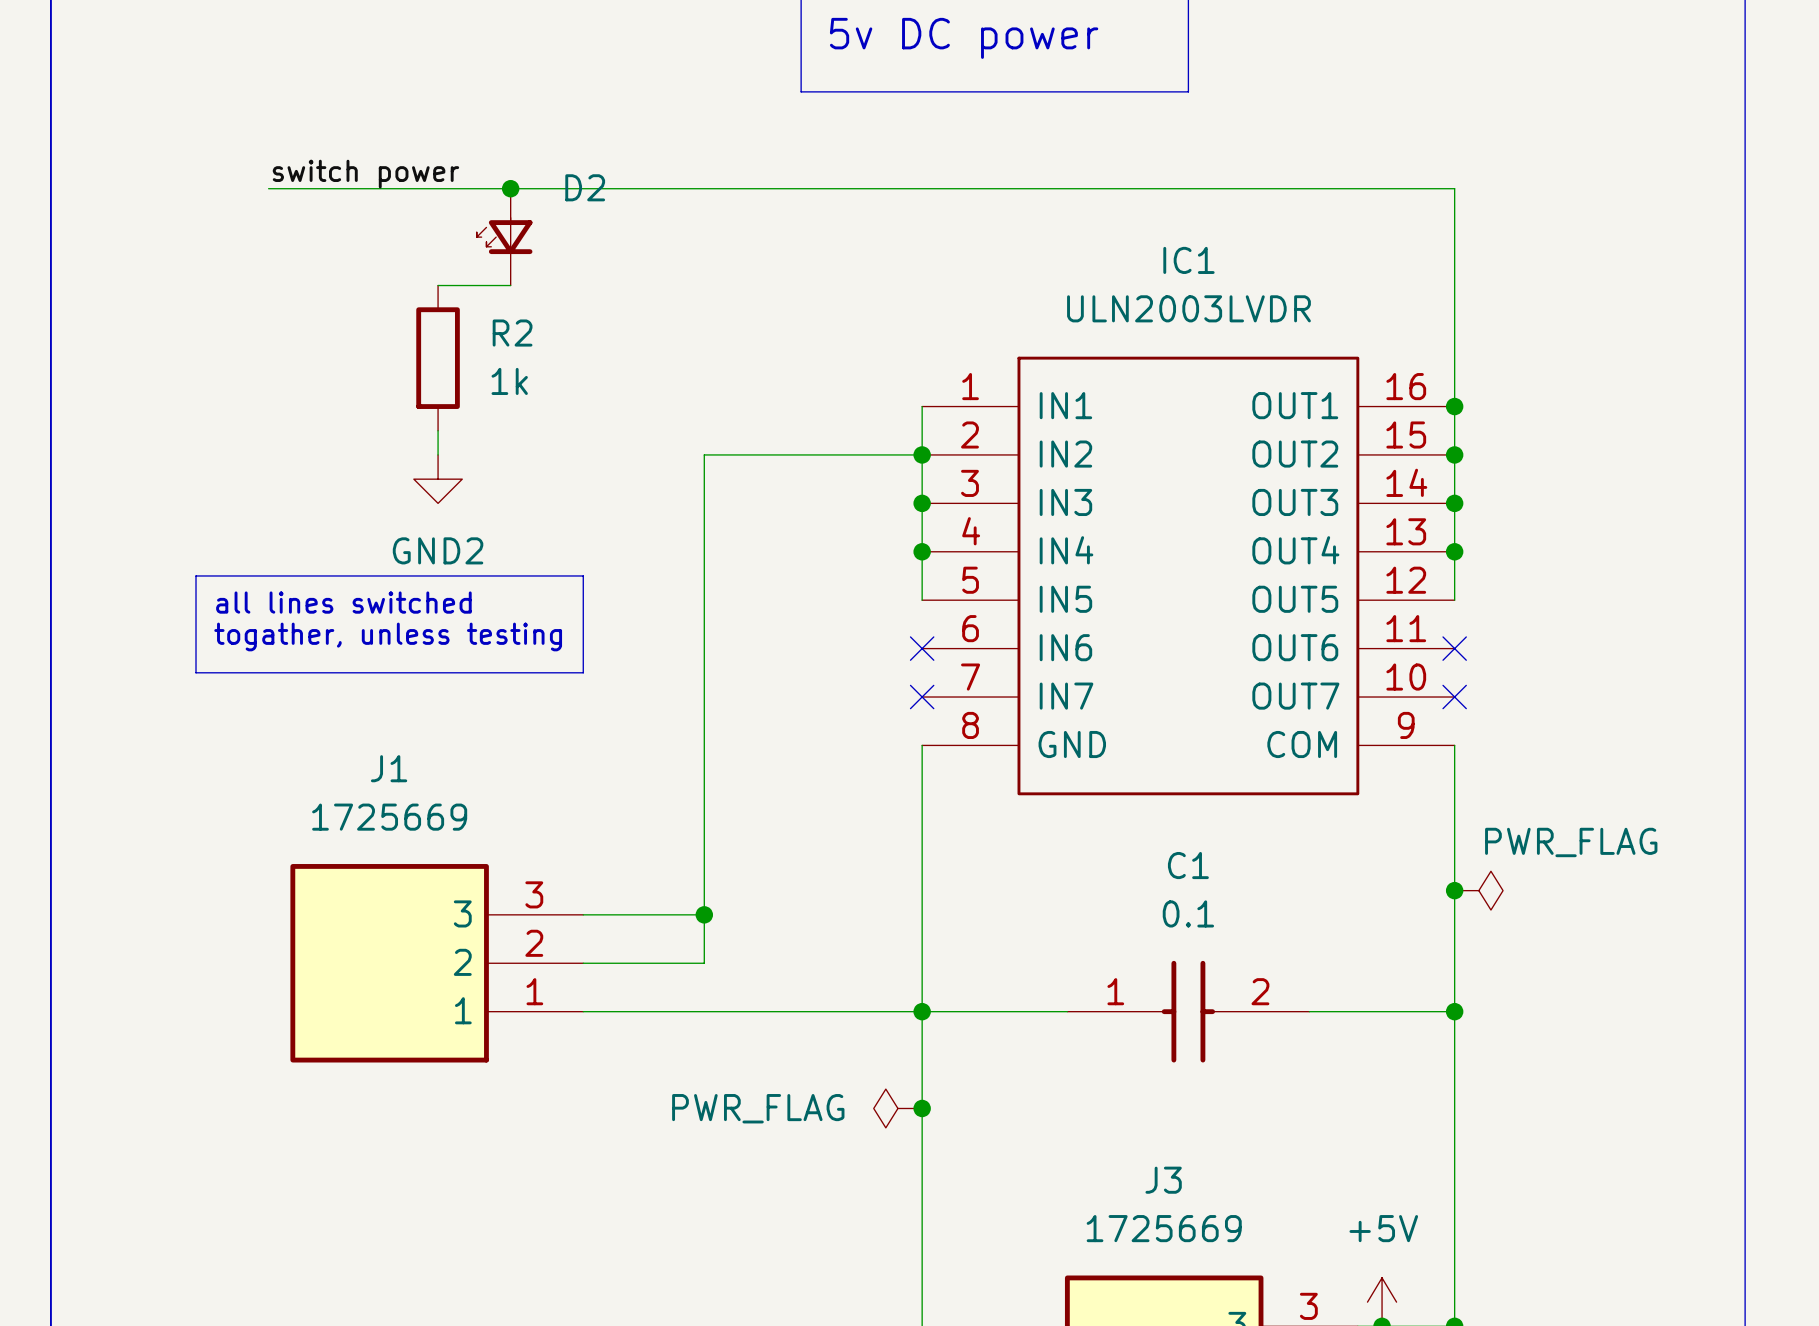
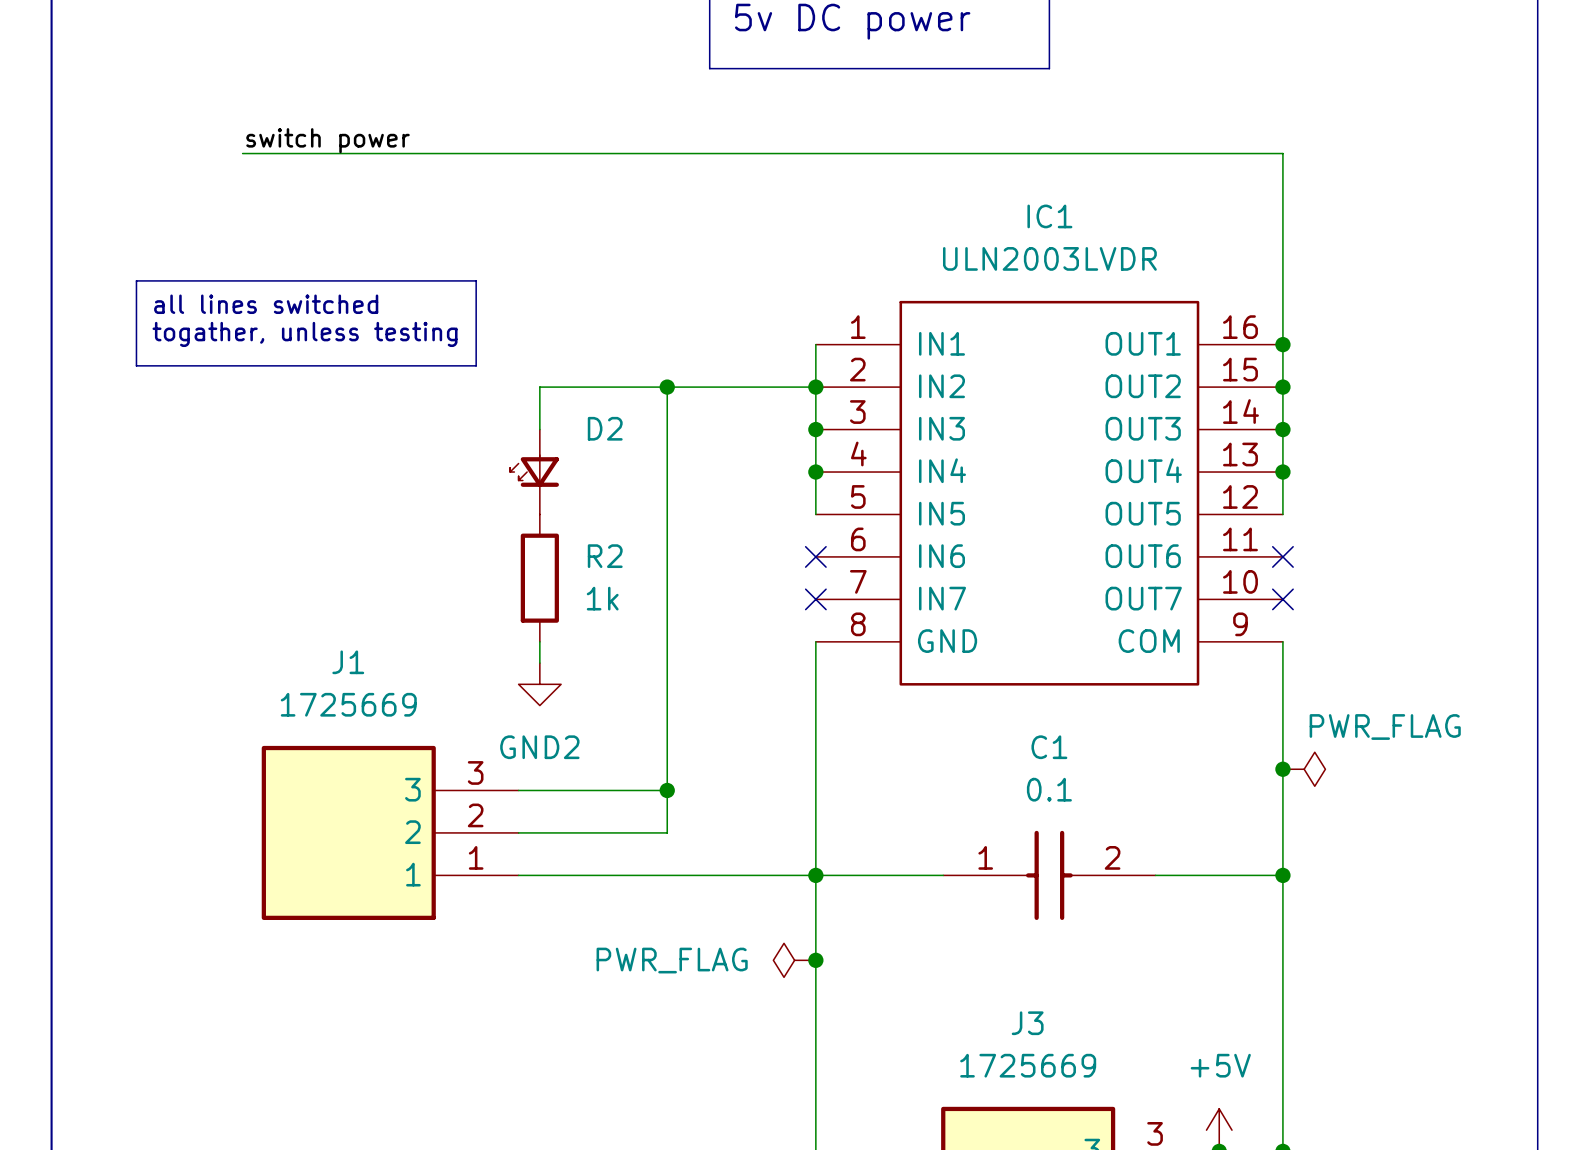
junction: (510, 188) -> none
D2 position: (504, 237) -> (534, 472)
wire: (438, 285) (510, 285) -> none
R2 position: (438, 358) -> (539, 578)
wire: (438, 430) (438, 454) -> (539, 641) (539, 663)
wire: (704, 454) (704, 963) -> (667, 387) (667, 832) (624, 832)
wire: none -> (624, 387) (539, 387) (539, 429)
junction: none -> (667, 387)
power symbol position: GND2 (438, 479) -> GND2 (539, 684)
line: (196, 575) (583, 575) (583, 672) (196, 672) (196, 575) -> (136, 280) (476, 280) (476, 365) (136, 365) (136, 280)
text position: all lines switched (343, 602) -> all lines switched (266, 304)
text position: togather, unless testing (388, 636) -> togather, unless testing (305, 334)
wire: none -> (624, 790) (667, 790)
junction position: (704, 914) -> (667, 790)

